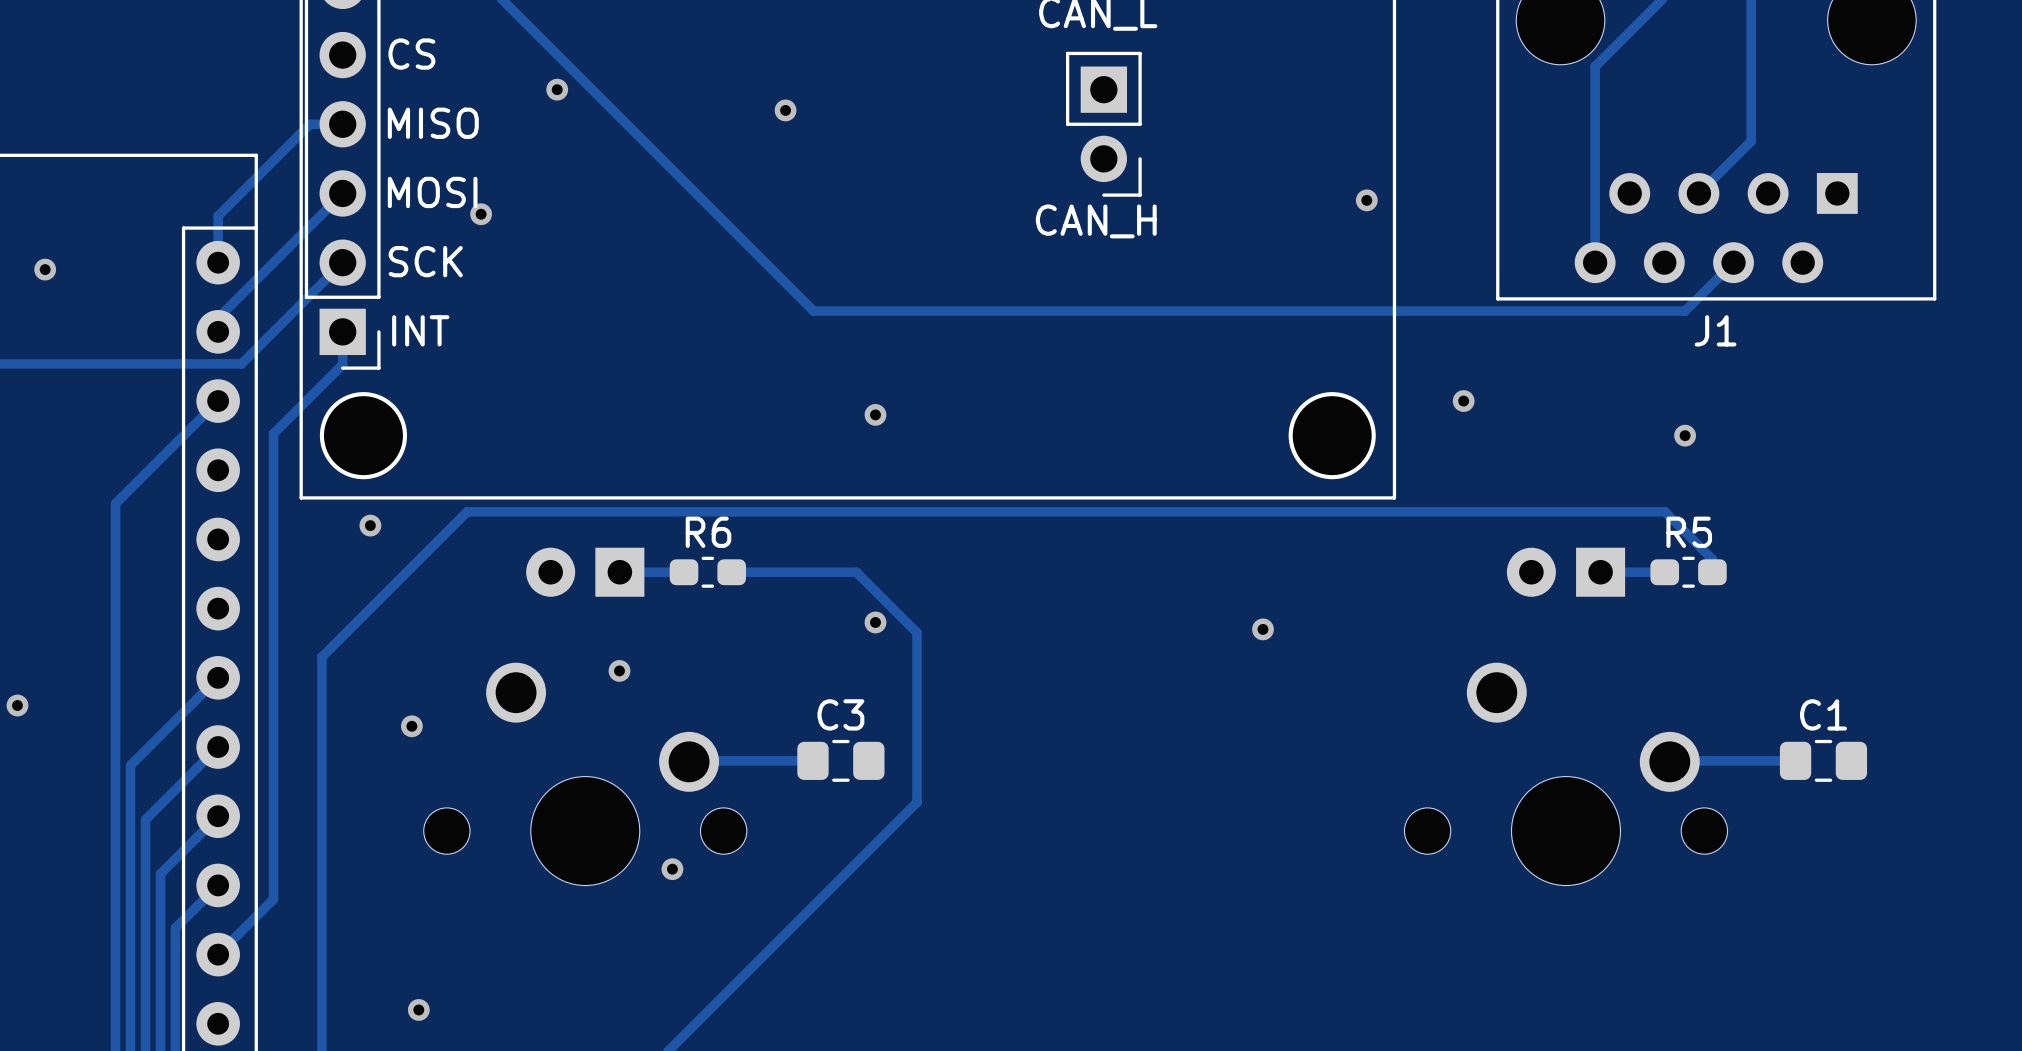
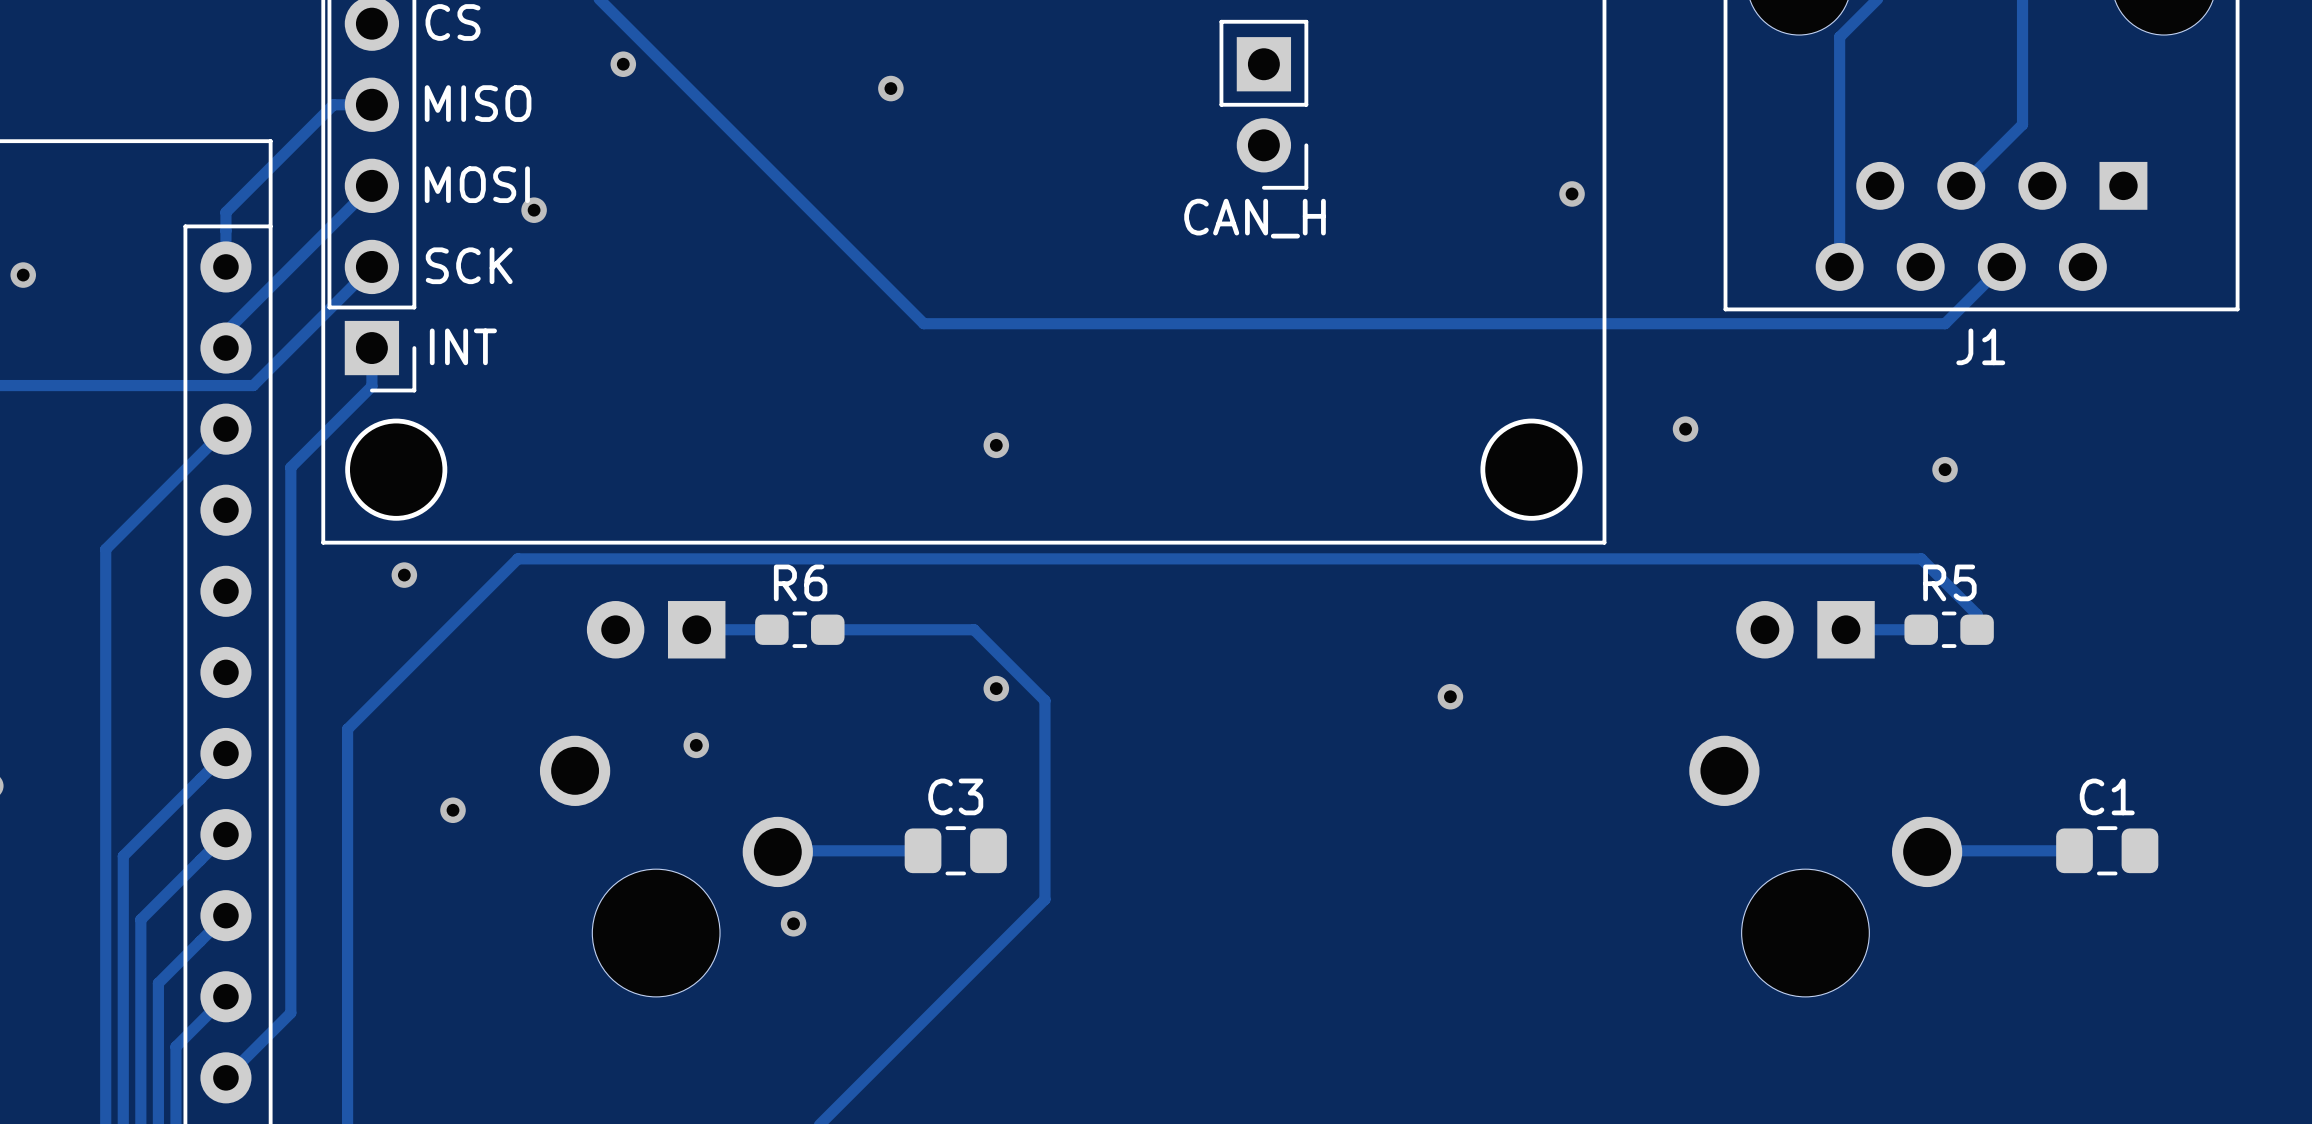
part footprint: [423, 662, 747, 886] -> [539, 735, 813, 997]
part footprint: [1404, 662, 1728, 886] -> [1689, 735, 1963, 997]
via position: (672, 869) -> (793, 923)

